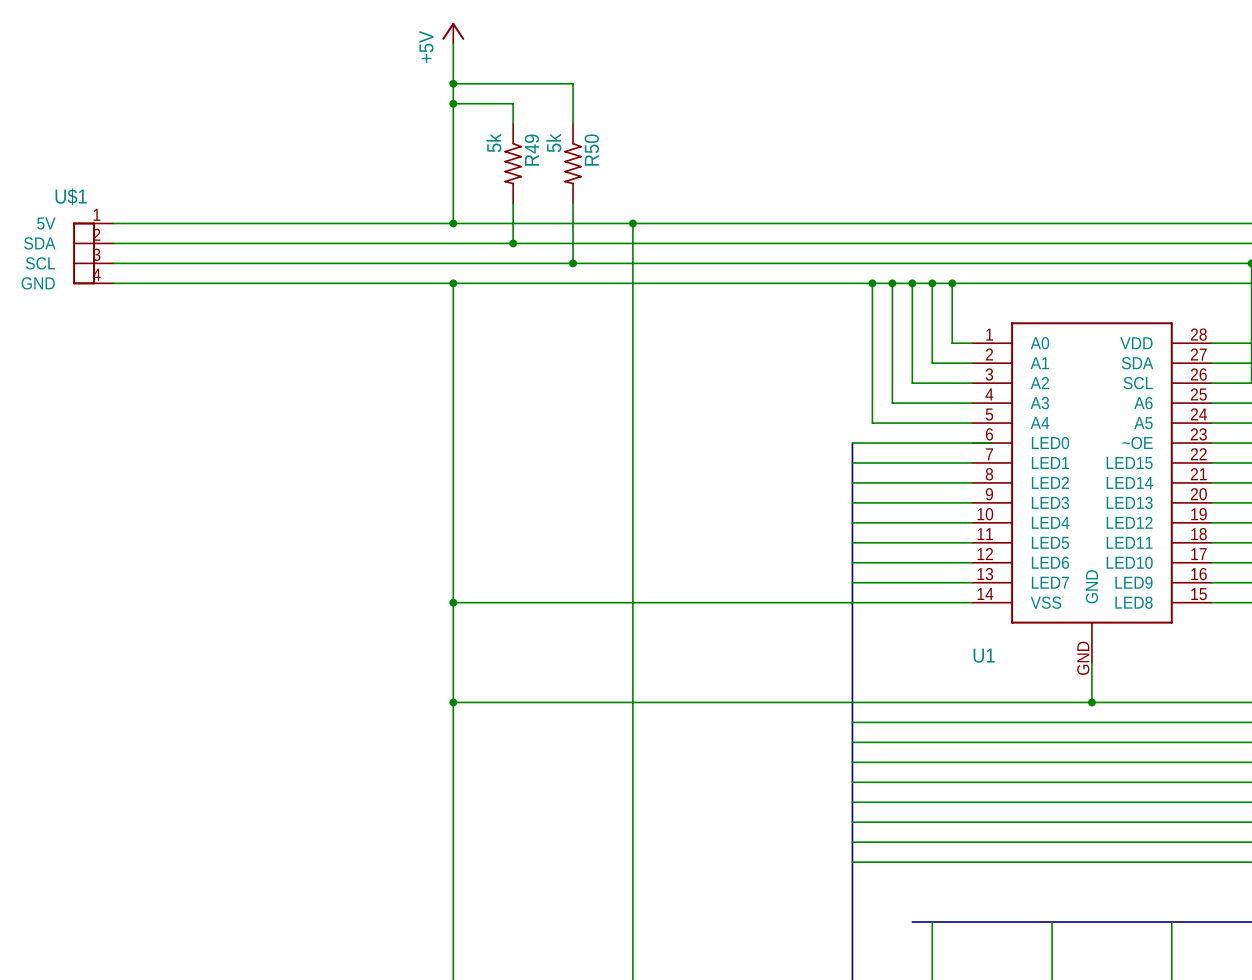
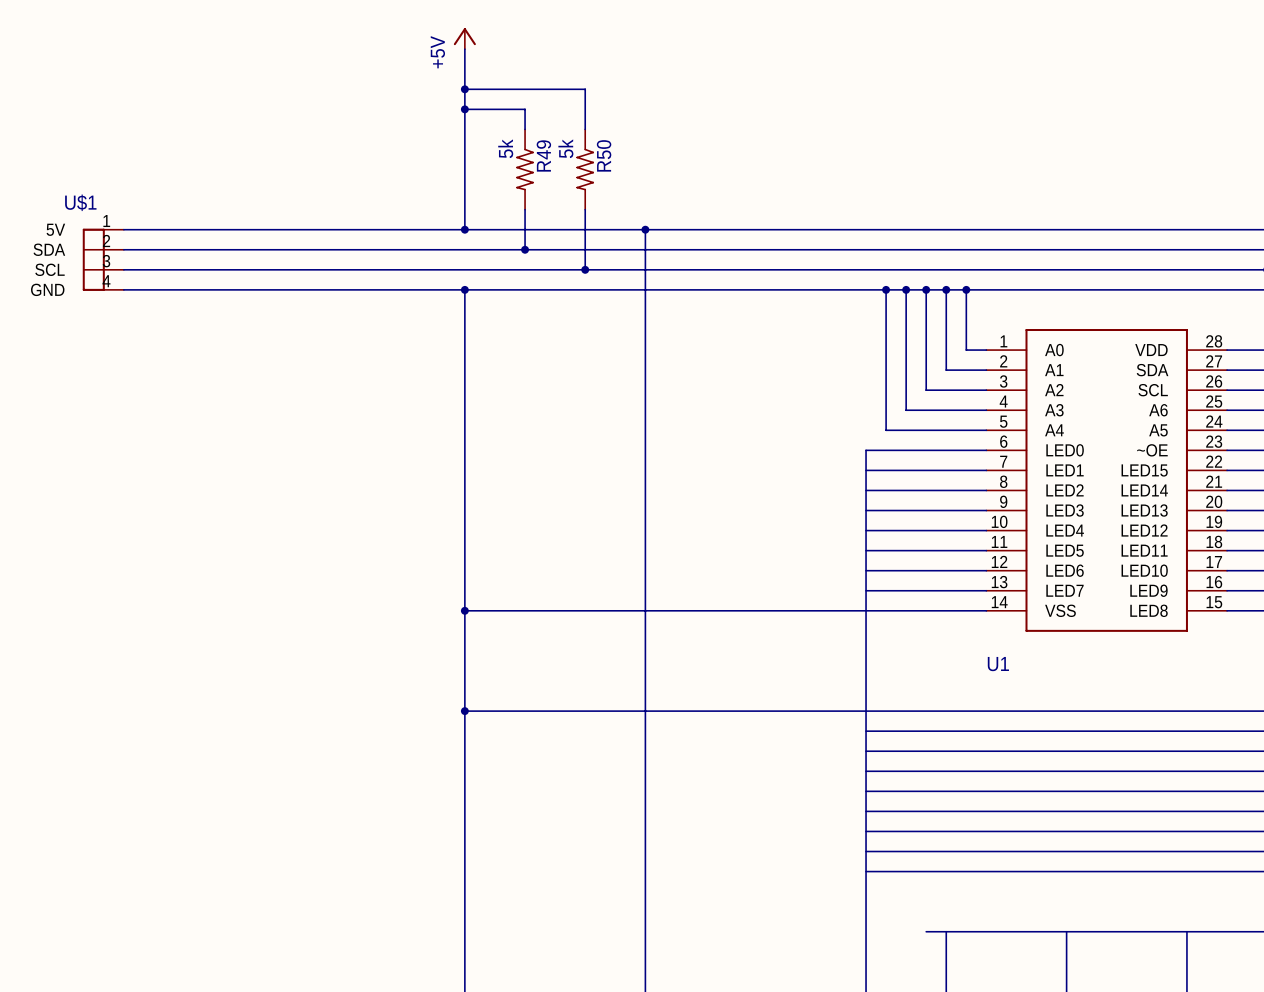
U1 symbol: [972, 322, 1212, 663] -> [986, 328, 1228, 632]
wire: (1091, 662) (1091, 702) -> none
junction: (1091, 702) -> none

